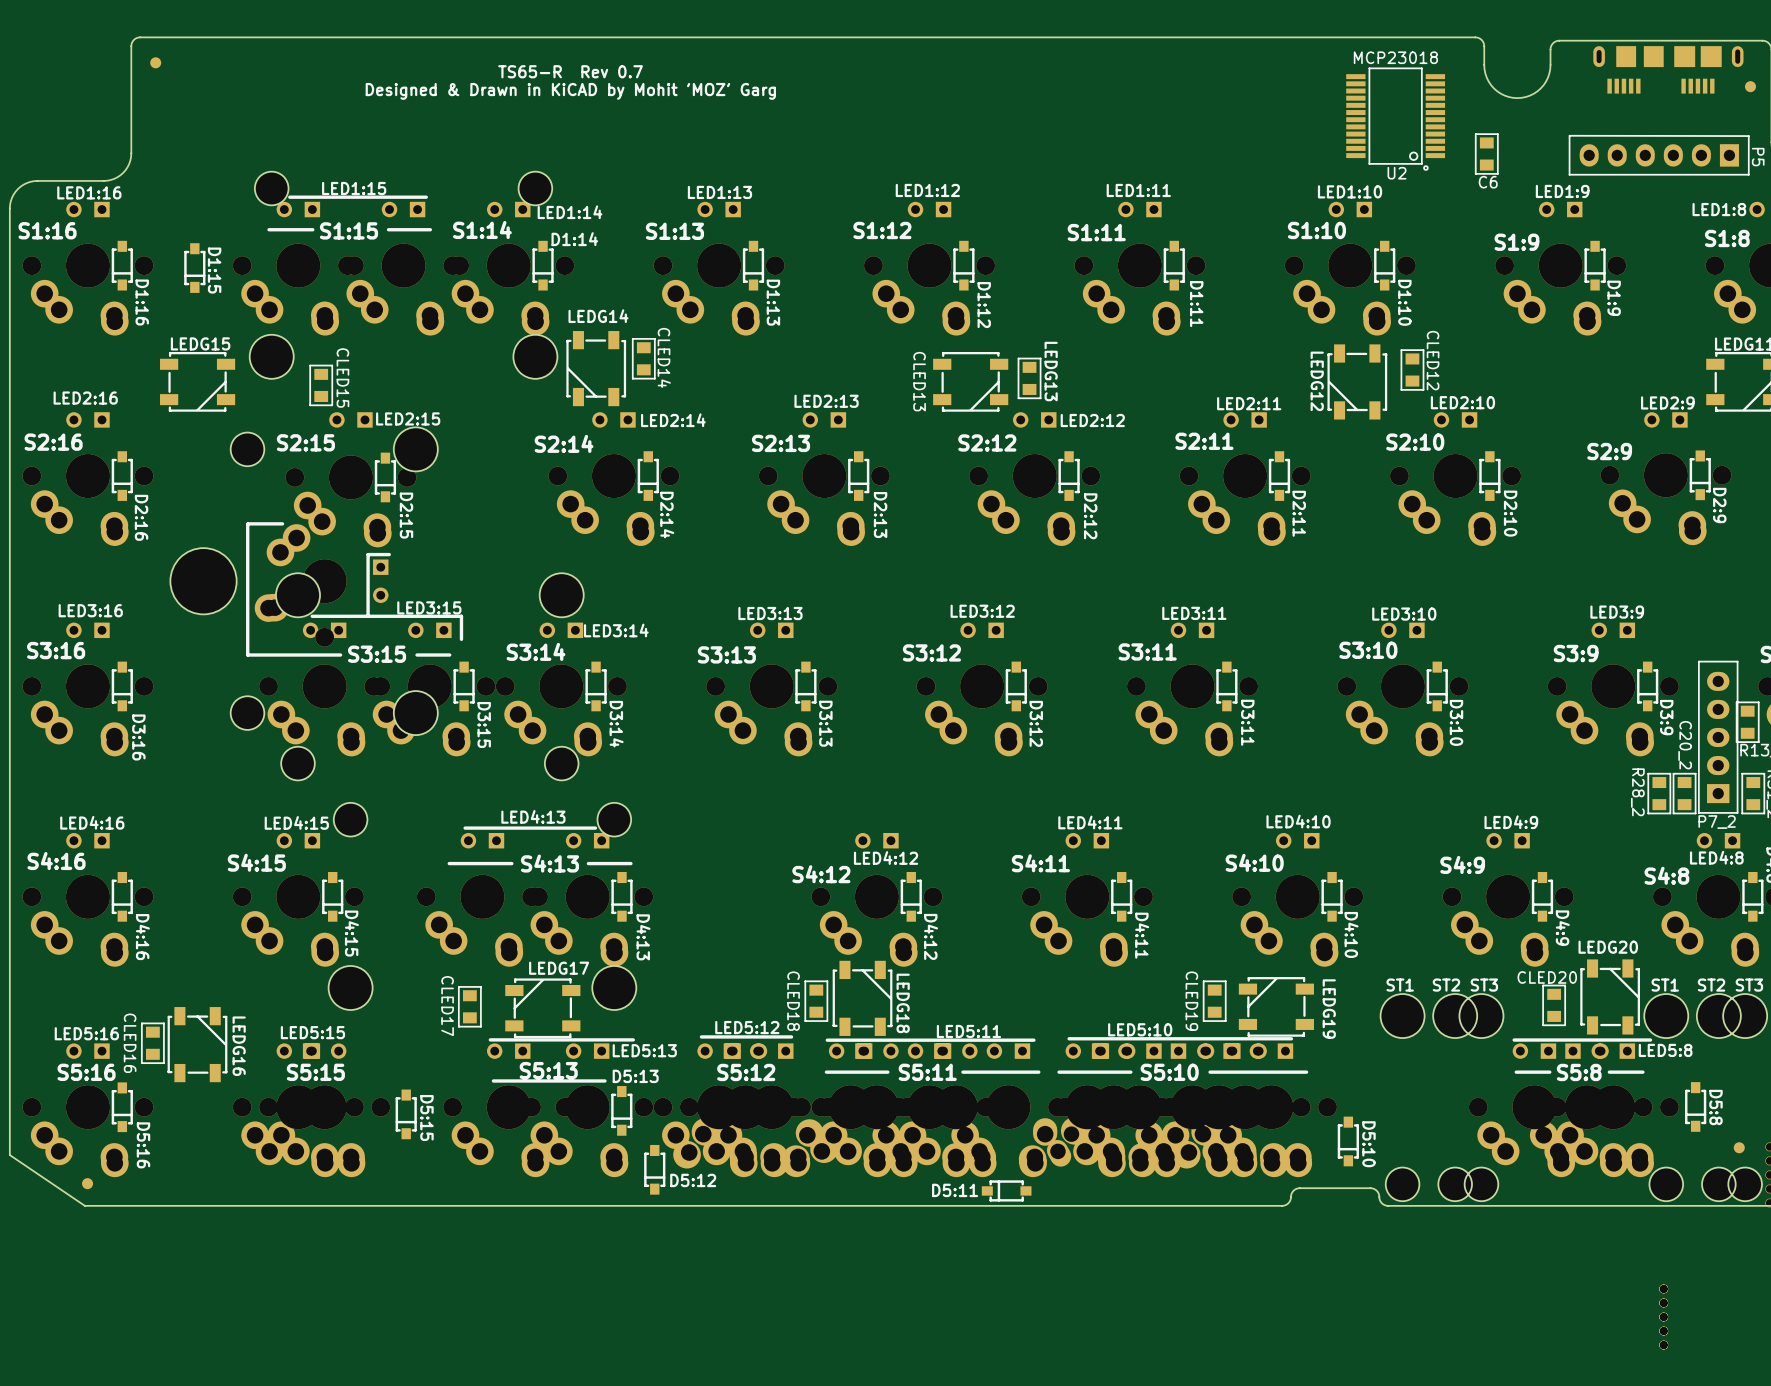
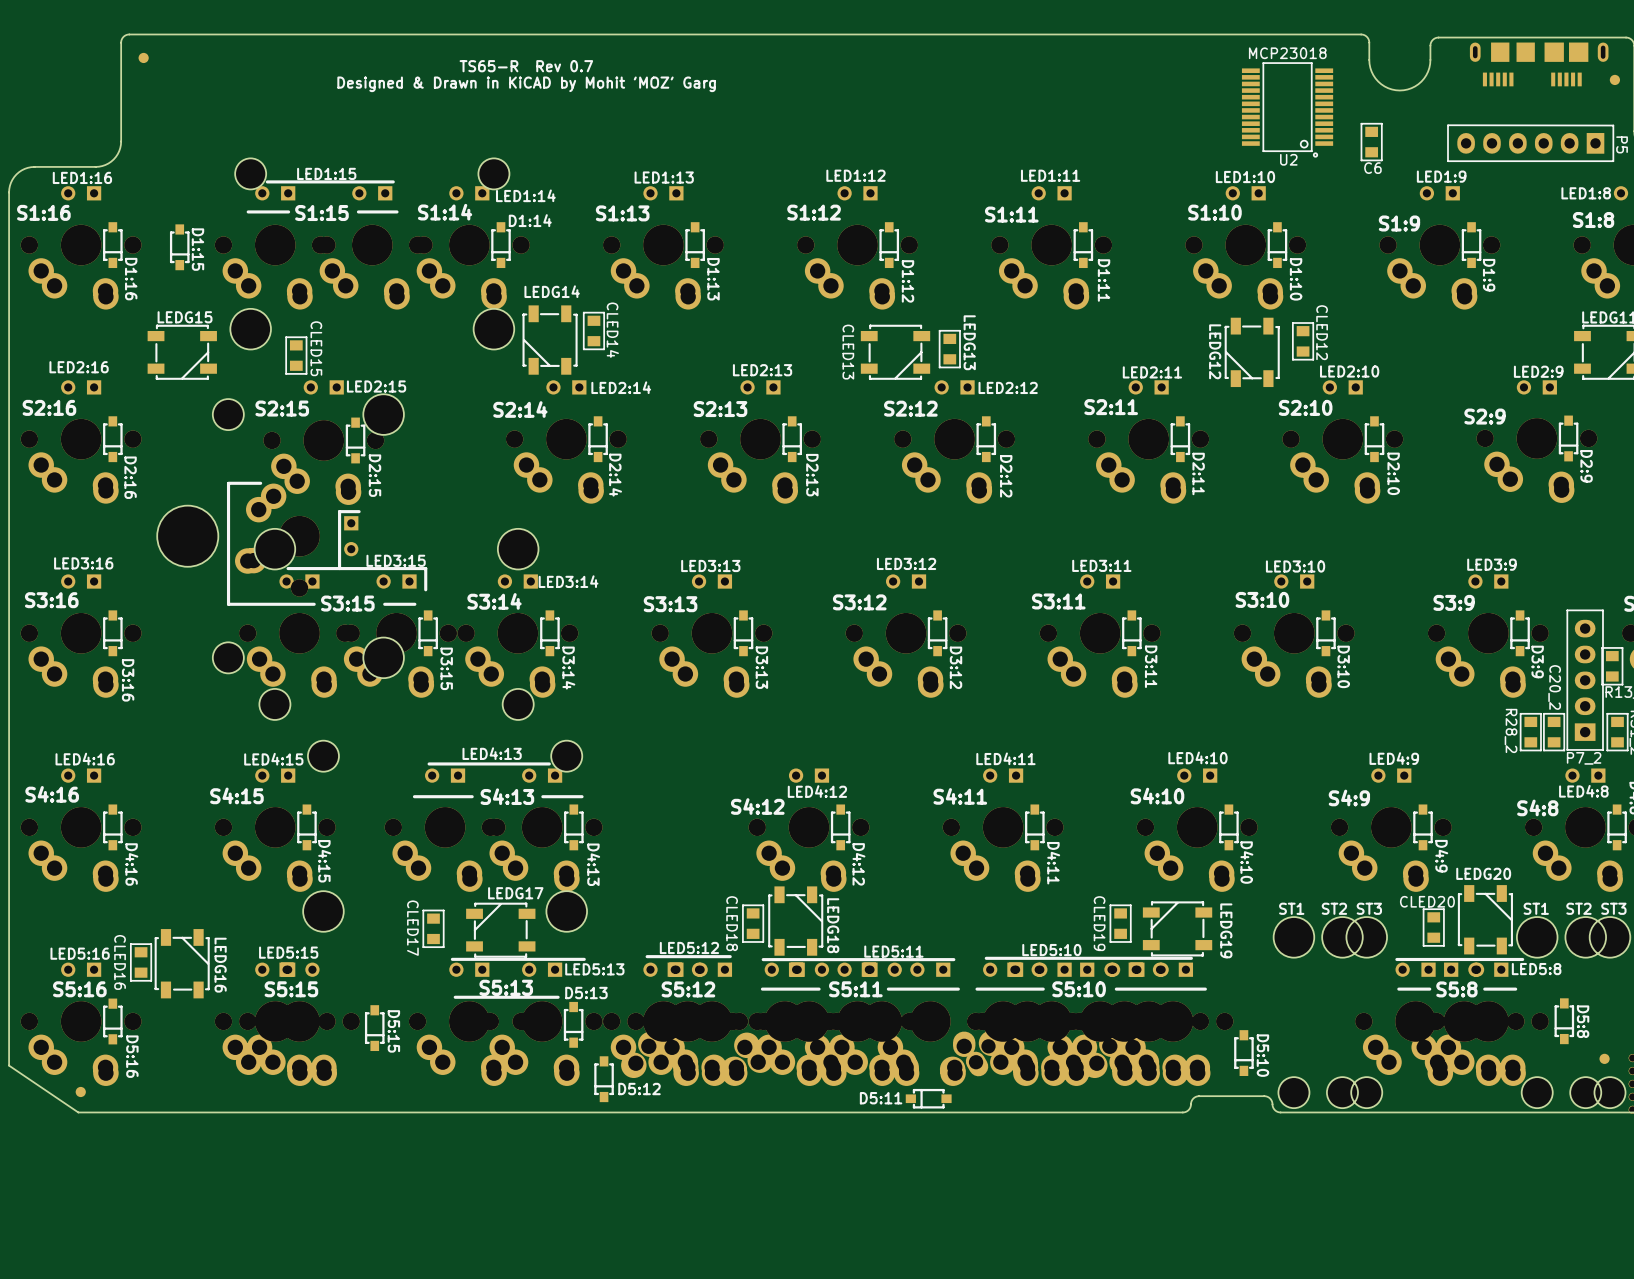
part: (1663, 1317) -> none

